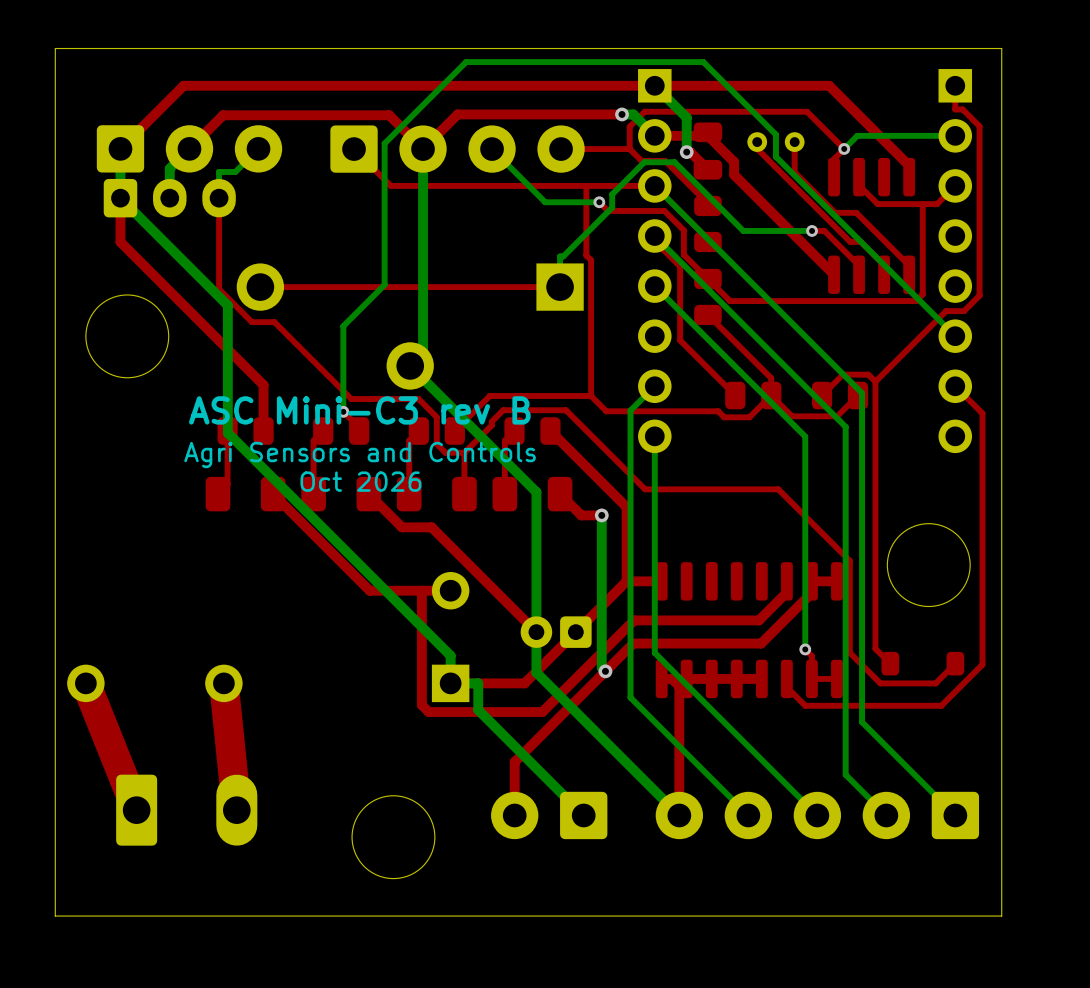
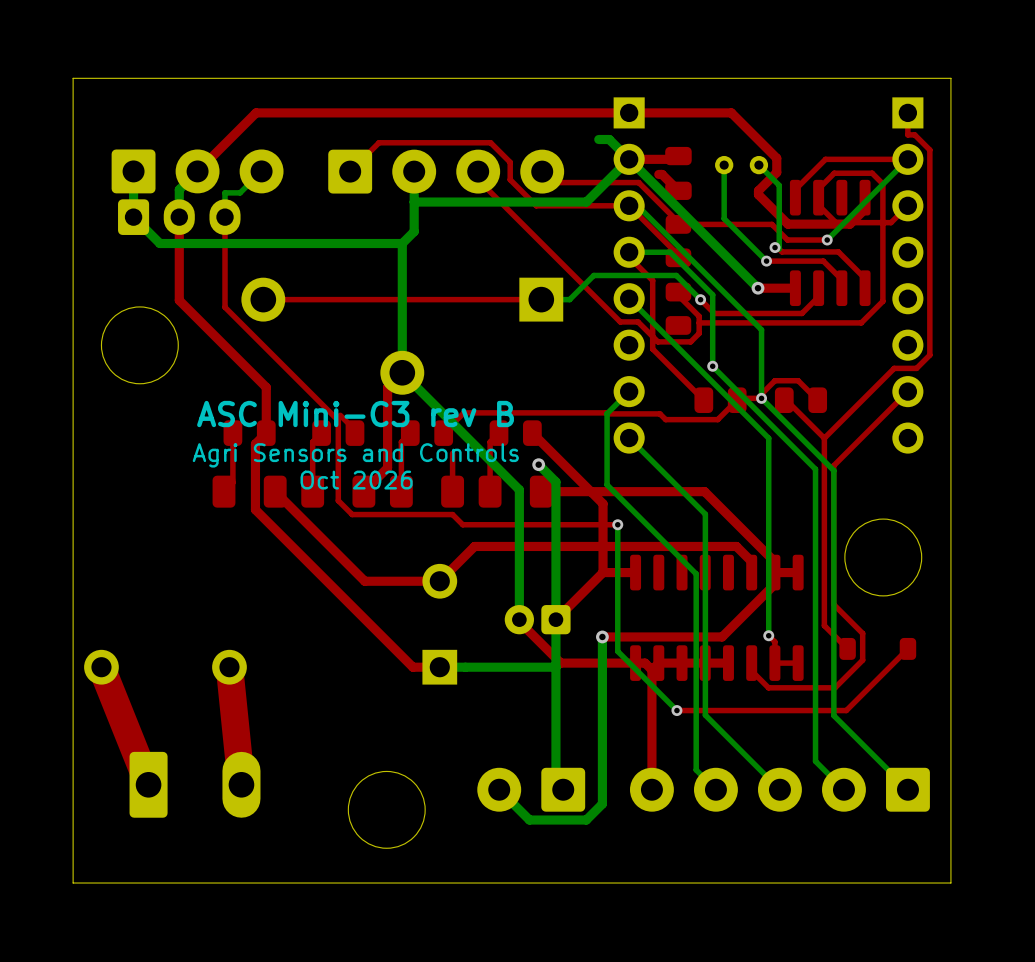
top track: (252, 85) (183, 85) (120, 148) -> (256, 112) (228, 140)
bottom track: (654, 85) (686, 117) (686, 152) -> none
top track: (765, 85) (829, 85) (909, 165) (909, 177) -> (731, 112) (776, 158) (776, 172) (758, 190) (758, 194) (787, 224) (850, 224) (865, 209) (865, 197)
top track: (622, 114) (457, 114) (423, 149) (389, 115) (223, 115) -> none
via: (622, 114) -> none
top track: (978, 125) (979, 295) (964, 311) (946, 311) (875, 381) -> (929, 149) (929, 355) (916, 368) (894, 368) (824, 438)
top track: (707, 135) (734, 162) (734, 174) (834, 274) -> (758, 288) (795, 288)
bottom track: (955, 135) (857, 135) (844, 148) -> (907, 159) (827, 240)
top track: (757, 142) (757, 148) (850, 241) (860, 241) (884, 265) -> (766, 261) (823, 261) (841, 279)
bottom track: none -> (724, 165) (724, 218) (766, 261)
top track: (794, 142) (794, 172) (835, 212) (856, 212) (909, 265) -> (779, 249) (781, 251) (838, 251) (865, 279)
bottom track: none -> (758, 165) (779, 185) (779, 249)
via: (844, 148) -> none
top track: (354, 149) (390, 185) (554, 185) -> (350, 171) (379, 142) (490, 142) (510, 162) (510, 179) (536, 205)
top track: none -> (478, 171) (478, 179) (620, 321) (638, 321) (657, 341) (690, 341) (699, 333) (699, 316) (678, 295) (678, 292)
bottom track: (492, 149) (545, 202) (599, 202) -> none
top track: (629, 149) (561, 149) -> (616, 182) (553, 182) (542, 171)
top track: (629, 149) (629, 126) (644, 111) (807, 111) (844, 148) (834, 159) (834, 168) -> (907, 159) (825, 159) (795, 189)
top track: (629, 149) (641, 160) -> none
via: (686, 152) -> none
top track: none -> (818, 197) (818, 188) (834, 173) (872, 173) (882, 183) (882, 301) (861, 322) (699, 322)
bottom track: none -> (414, 202) (586, 202) (629, 159) (758, 288)
top track: (586, 185) (586, 255) (591, 260) (591, 395) -> none
bottom track: (654, 185) (862, 393) (862, 722) (875, 735) -> (629, 205) (637, 205) (761, 329) (761, 398) (833, 470) (833, 715)
top track: (120, 198) (120, 242) (263, 385) -> (179, 217) (179, 300) (266, 387) (266, 390)
top track: (599, 202) (608, 210) (664, 210) (683, 230) (683, 254) (730, 301) (916, 301) (922, 294) (922, 204) -> none
via: (599, 202) -> none
top track: none -> (678, 224) (771, 224) (787, 240) (827, 240)
bottom track: (423, 213) (423, 353) (410, 365) -> (402, 243) (402, 372)
bottom track: none -> (414, 231) (402, 243)
via: none -> (827, 240)
bottom track: (148, 226) (227, 305) (227, 432) (450, 655) (450, 683) -> (159, 243) (402, 243)
top track: (812, 230) (824, 230) (859, 265) (859, 274) -> (700, 299) (714, 313) (801, 313) (818, 296) (818, 288)
bottom track: (812, 230) (743, 230) (674, 162) (644, 162) (612, 194) (612, 207) (563, 256) (560, 256) (560, 287) -> (700, 299) (676, 275) (593, 275) (569, 299) (541, 299)
bottom track: (654, 236) (845, 426) (845, 774) (855, 784) -> (629, 252) (670, 252) (712, 294) (712, 366) (815, 469) (815, 761)
via: none -> (766, 261)
via: none -> (758, 288)
via: none -> (700, 299)
top track: (219, 289) (251, 322) (274, 322) (351, 399) (418, 399) (436, 417) (436, 444) (445, 452) (464, 452) (492, 425) (492, 421) (503, 410) (566, 410) (645, 489) (778, 489) (849, 560) (849, 652) (880, 683) (935, 683) -> (225, 301) (225, 307) (338, 420) (338, 500) (352, 514) (452, 514) (462, 524) (617, 524)
top track: (707, 314) (771, 378) (771, 395) (792, 416) (837, 416) (858, 395) -> (737, 400) (739, 398) (761, 398) (761, 394) (774, 380) (798, 380) (817, 400)
bottom track: (955, 336) (775, 156) (775, 134) (703, 62) (466, 62) (384, 143) (384, 284) (343, 326) (343, 411) -> none
via: none -> (712, 366)
top track: (875, 381) (868, 374) (842, 374) (822, 395) -> (824, 438) (784, 400)
top track: (875, 381) (875, 648) -> (824, 438) (824, 625) (833, 635)
top track: (955, 386) (982, 413) (982, 664) (941, 705) (805, 705) (786, 687) -> (907, 391) (833, 465) (833, 604) (862, 633) (862, 660) (835, 687) (768, 687) (751, 670)
via: none -> (761, 398)
top track: (591, 395) (606, 411) (718, 411) (724, 417) (750, 416) -> (463, 412) (659, 413) (665, 419) (717, 419)
top track: (591, 395) (489, 395) (476, 409) -> none
bottom track: (630, 410) (630, 697) (727, 794) -> (607, 413) (607, 484) (696, 573) (696, 770)
via: (343, 411) -> none
bottom track: (654, 436) (654, 652) (736, 735) -> (629, 438) (705, 514) (705, 715)
bottom track: none -> (538, 464) (555, 481) (555, 782)
top track: (368, 494) (402, 527) (431, 527) (536, 632) -> (363, 491) (387, 467) (387, 387) (402, 372)
top track: (560, 494) (581, 515) (601, 515) -> (541, 491) (704, 491) (774, 561) (774, 572)
bottom track: (601, 515) (601, 667) (605, 671) -> none
via position: (601, 515) -> (538, 464)
bottom track: none -> (617, 524) (617, 651) (676, 710)
via: none -> (617, 524)
top track: (786, 581) (786, 592) (758, 620) (634, 620) (542, 712) (428, 712) (421, 705) (421, 590) -> (751, 572) (751, 561) (736, 546) (474, 546) (439, 581)
top track: (811, 592) (761, 643) (633, 643) (514, 762) (514, 815) -> (774, 583) (722, 636) (602, 636)
top track: none -> (519, 619) (560, 663) (635, 663)
bottom track: (536, 632) (536, 672) (679, 815) -> none
top track: (575, 632) (524, 683) (450, 683) -> (266, 433) (255, 443) (255, 509) (412, 667) (439, 667)
bottom track: none -> (602, 636) (602, 803) (586, 820) (529, 820) (499, 789)
via position: (605, 671) -> (602, 636)
bottom track: (478, 683) (478, 710) (575, 807) -> (465, 667) (555, 667)
top track: none -> (889, 667) (846, 710) (676, 710)
via: none -> (676, 710)

